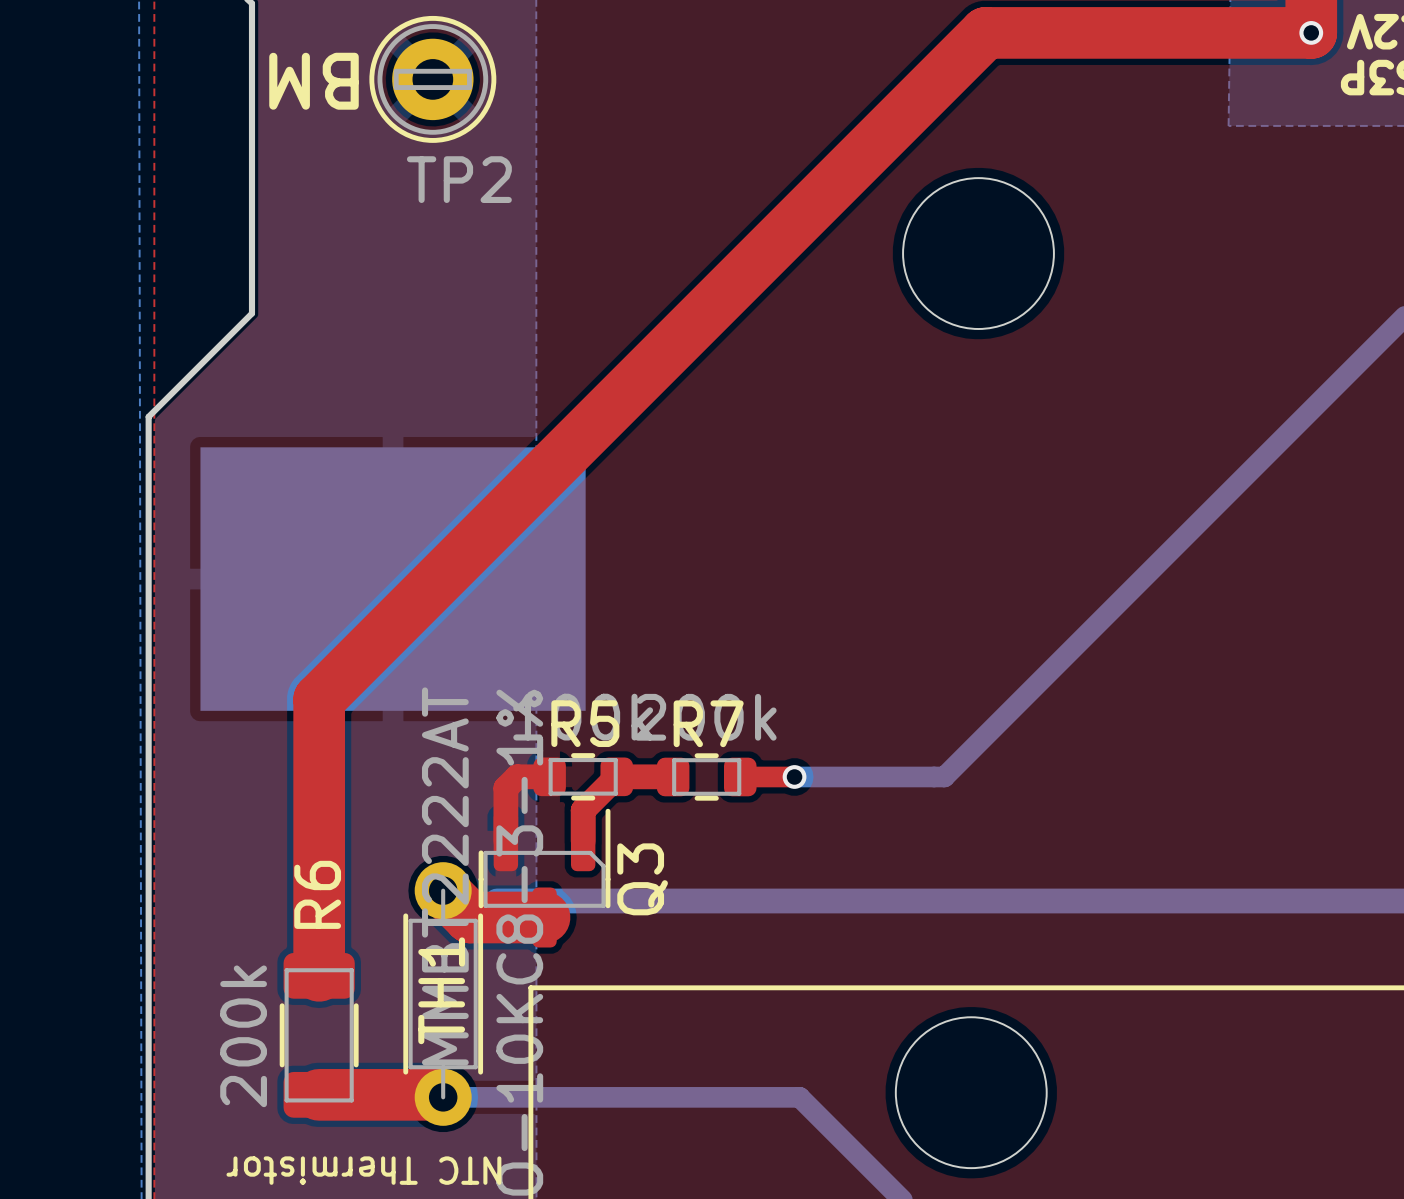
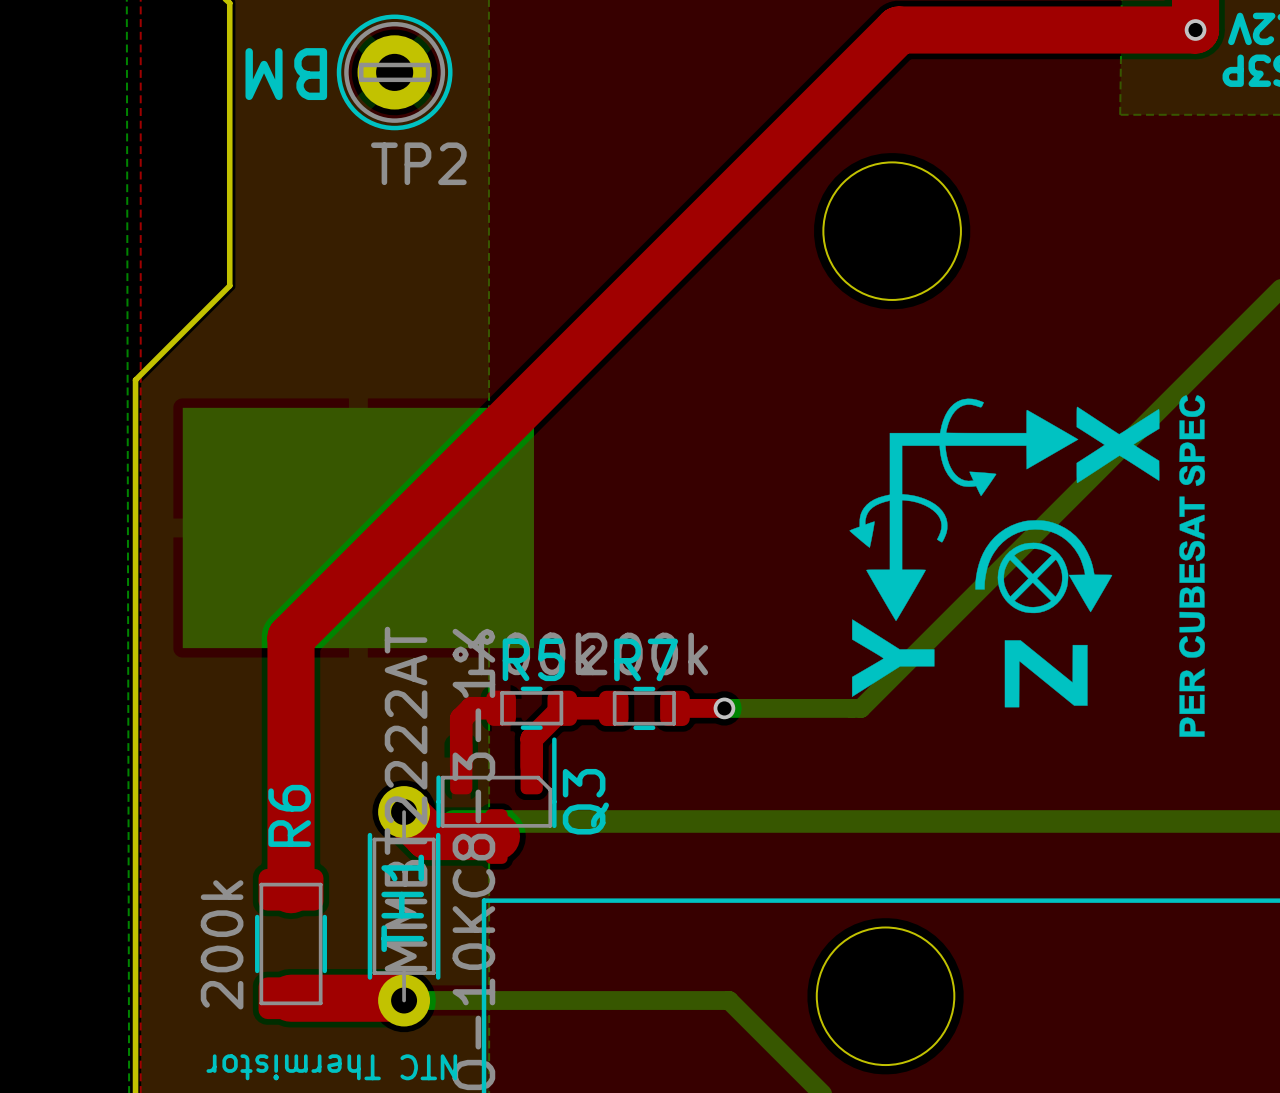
drawing: none -> [849, 395, 1205, 737]

